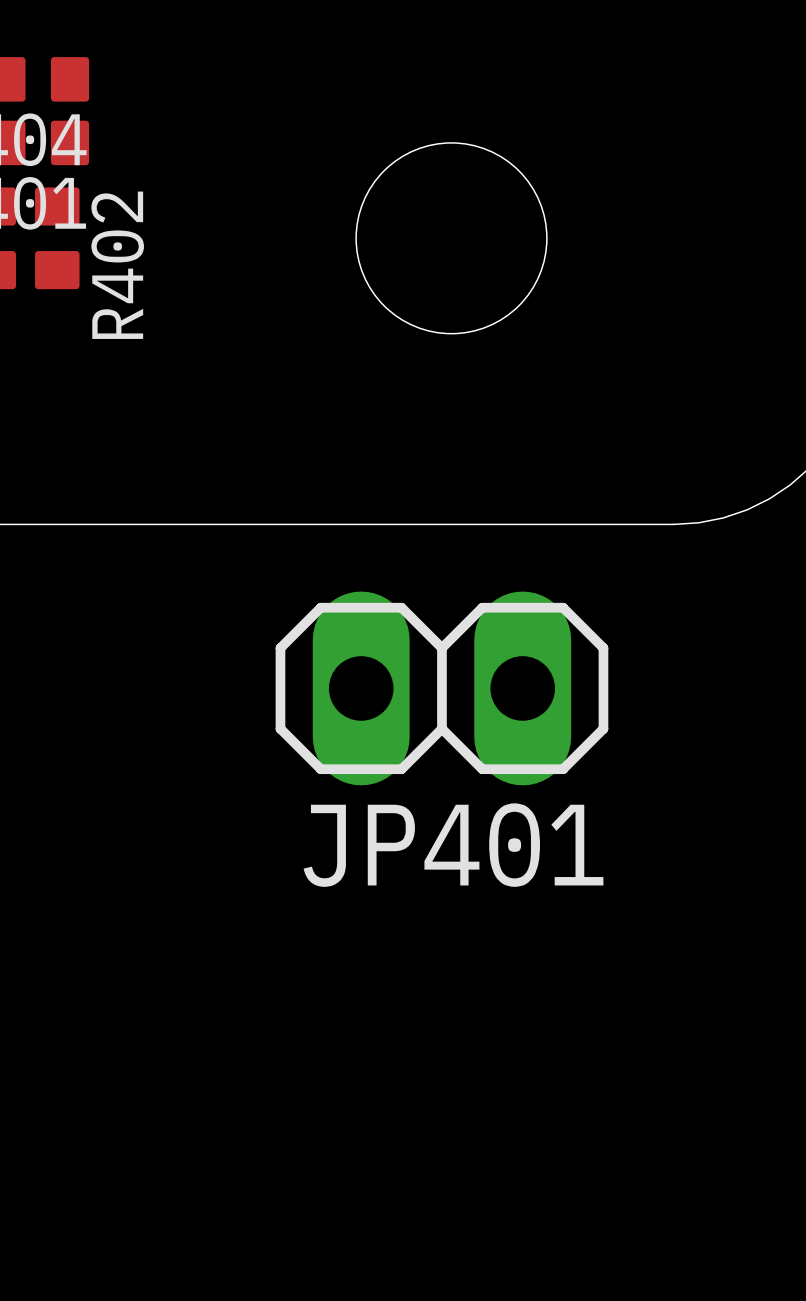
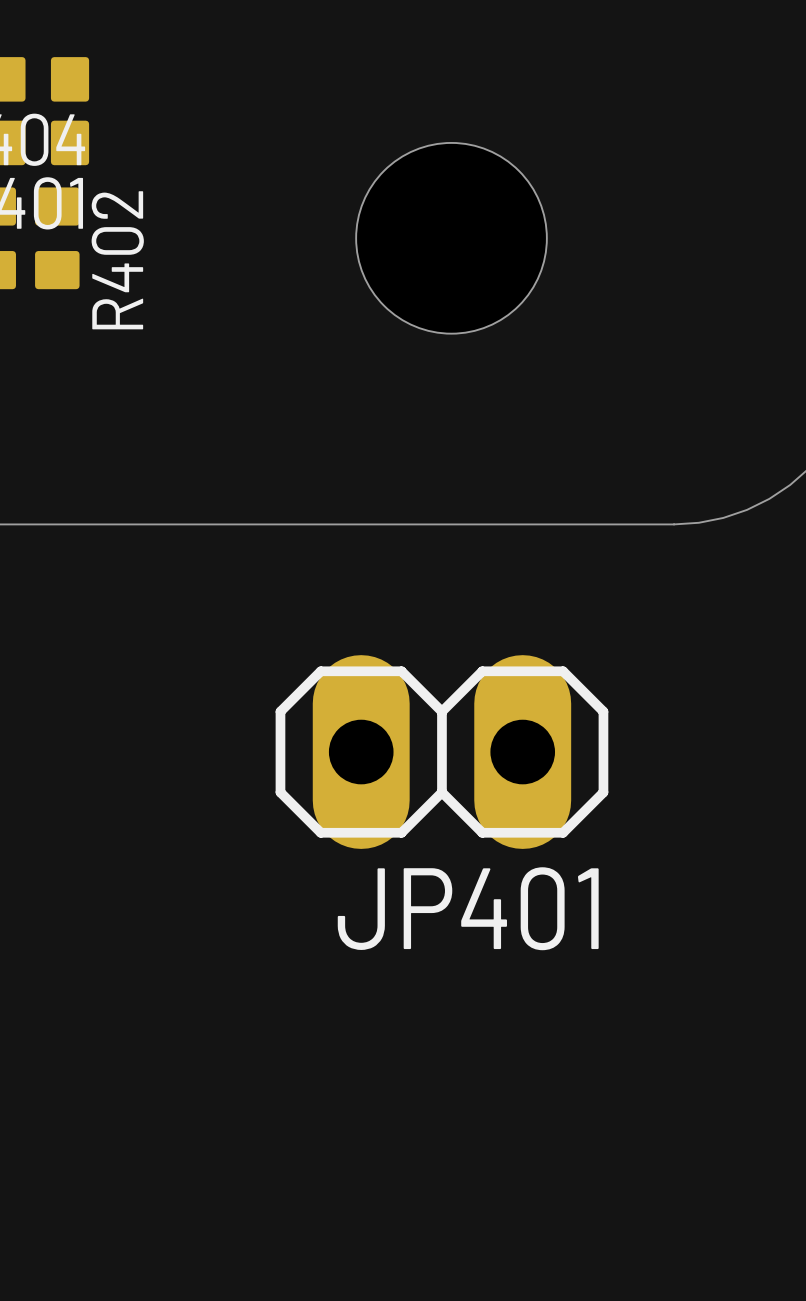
JP401 position: (441, 688) -> (441, 752)

